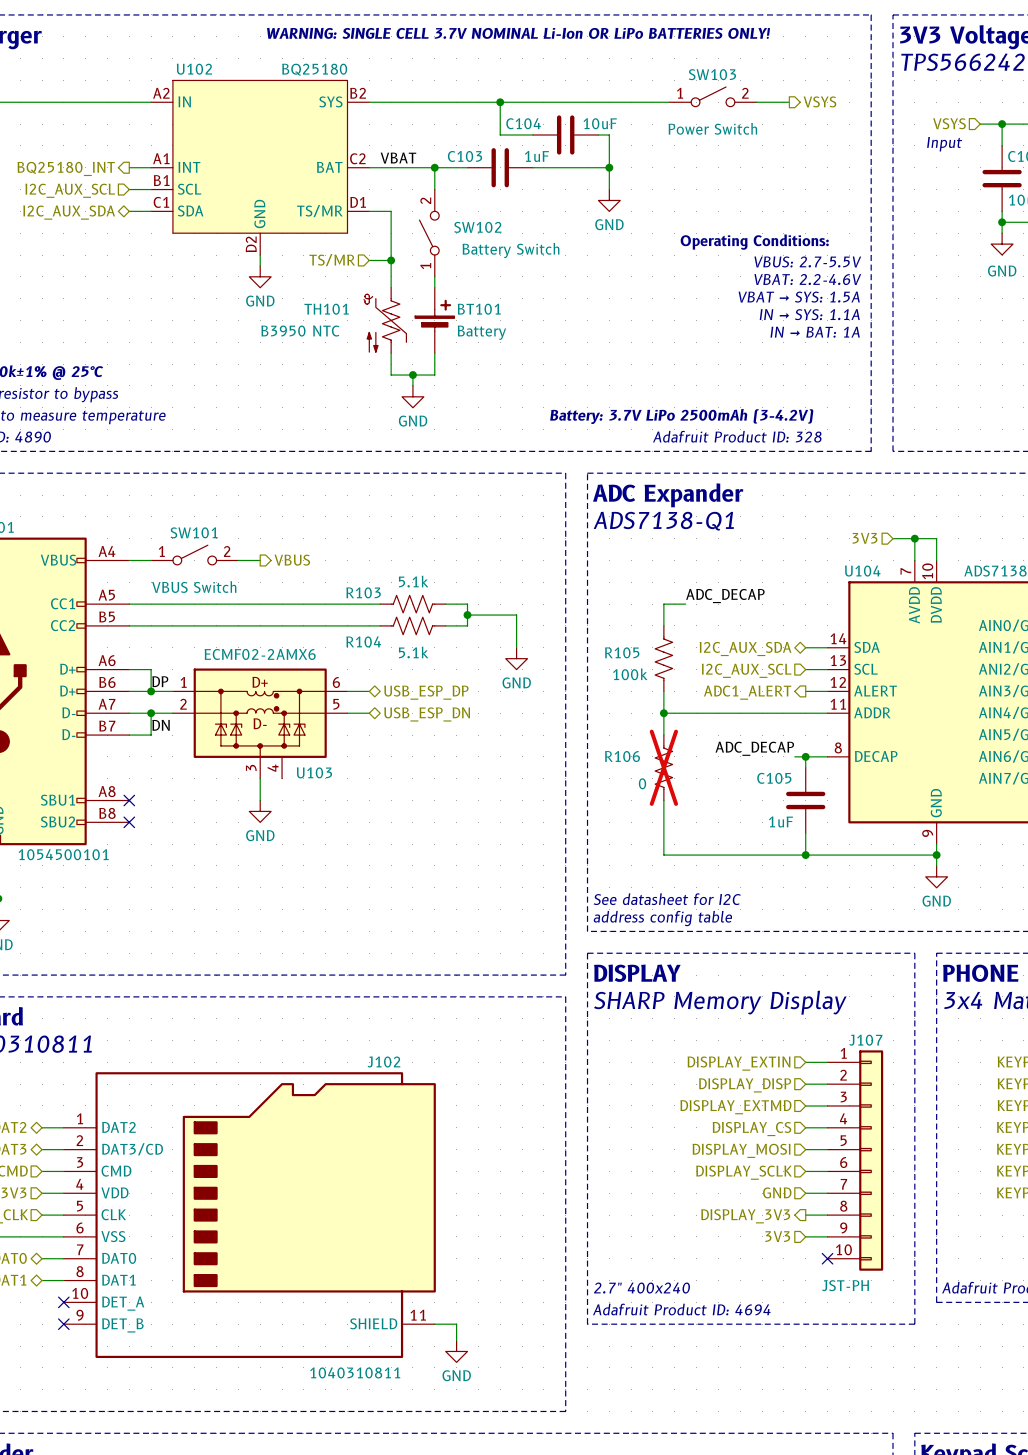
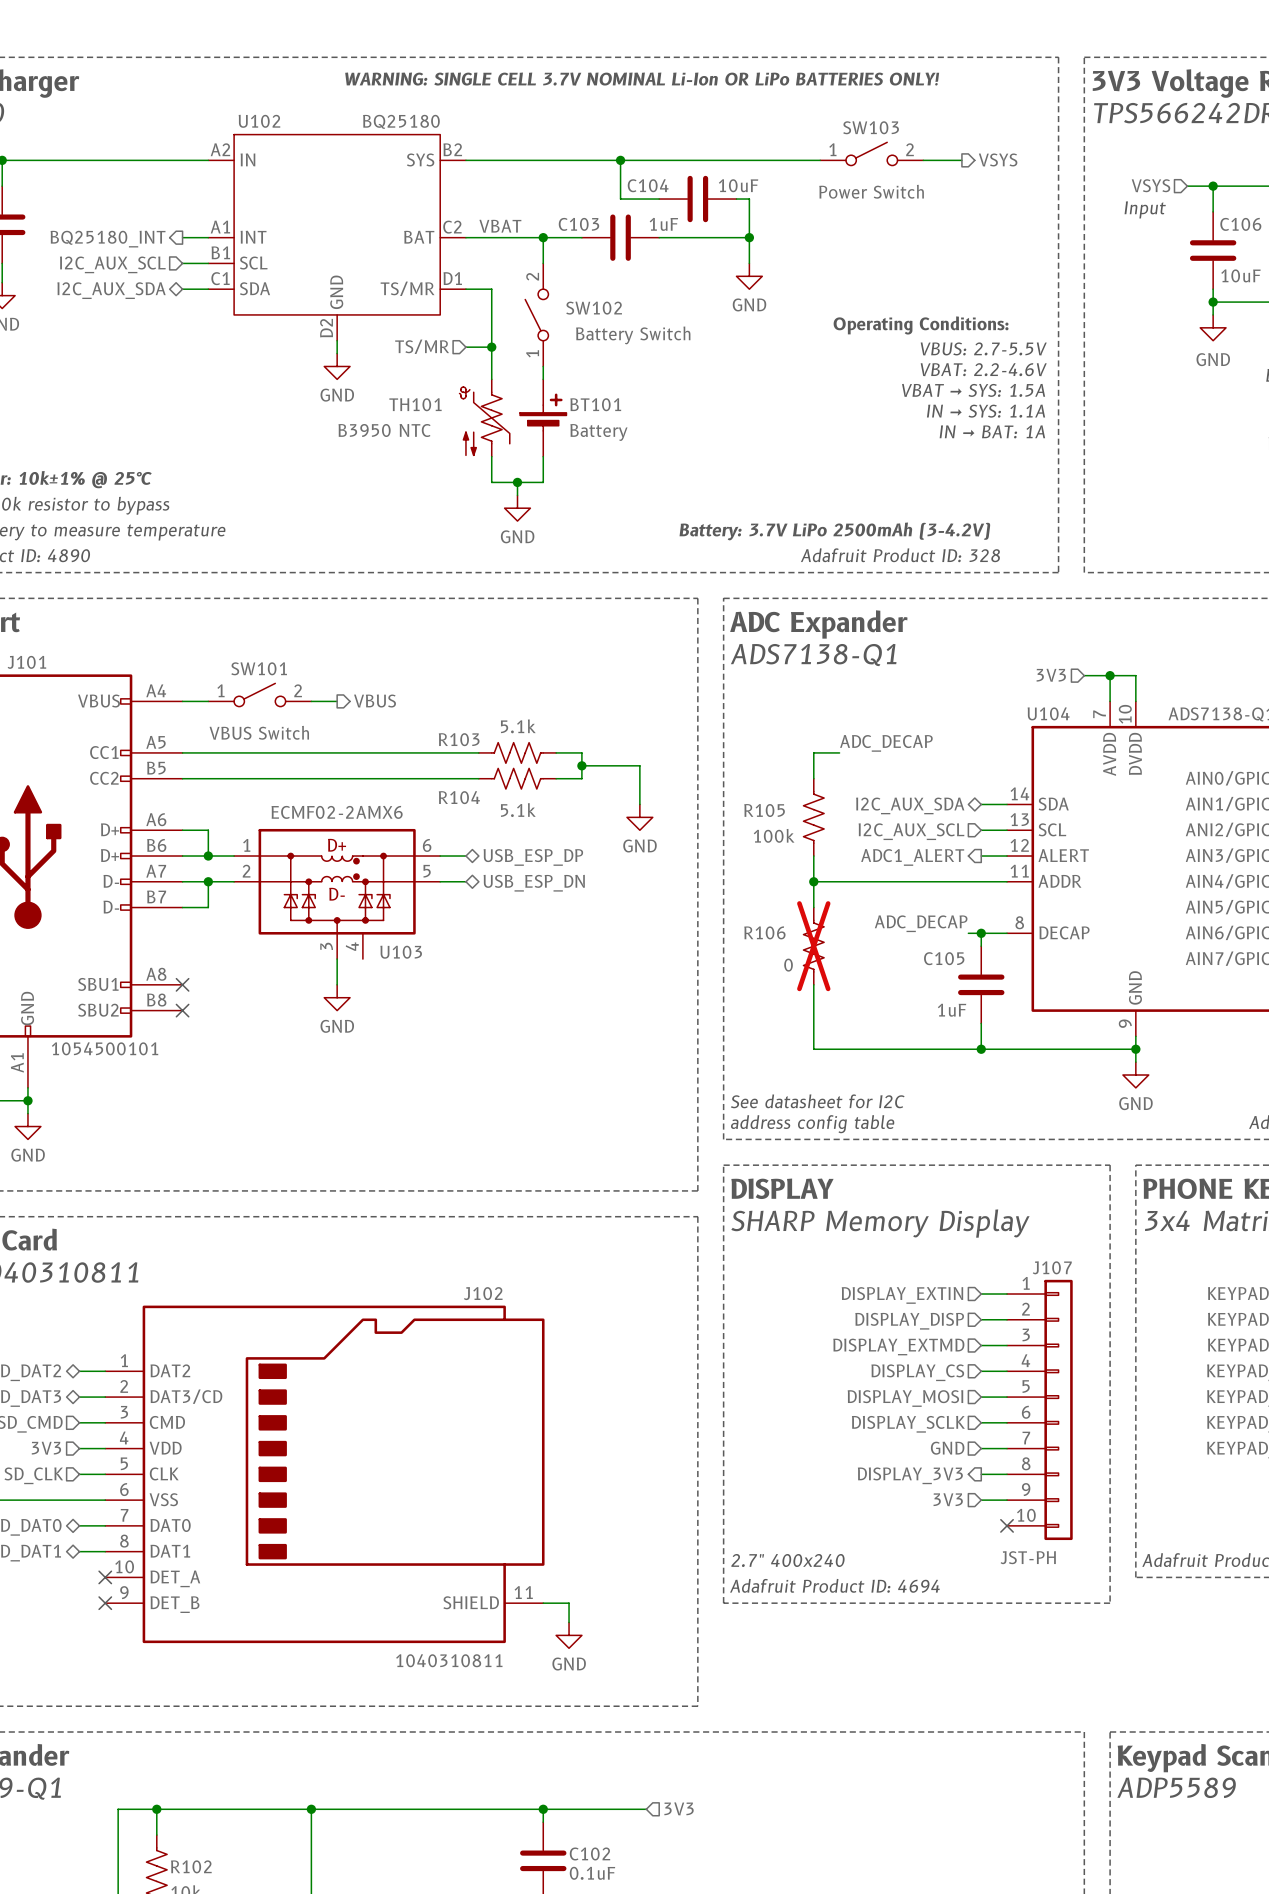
label: DP (160, 681) -> none
label: DN (161, 725) -> none

